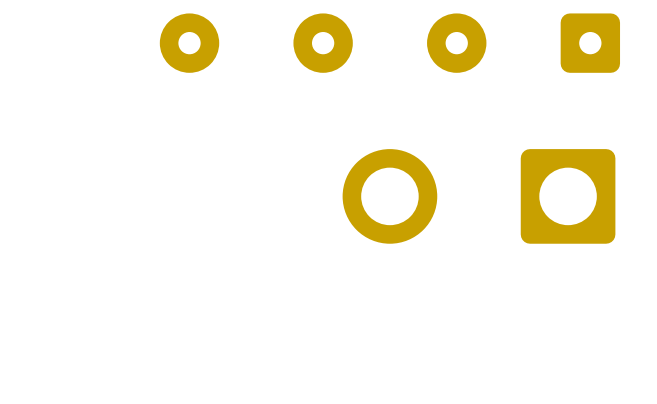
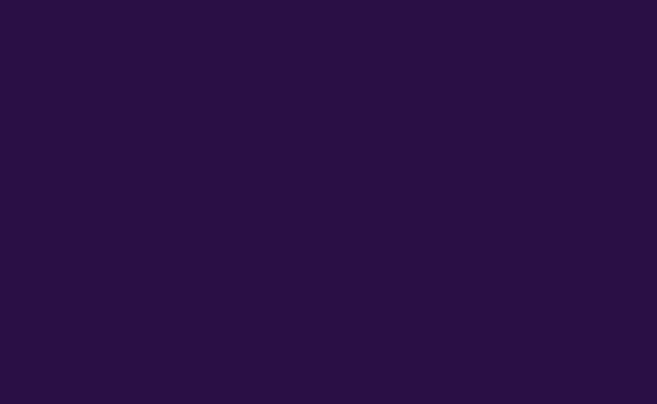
part: (389, 43) -> none
part: (479, 196) -> none

